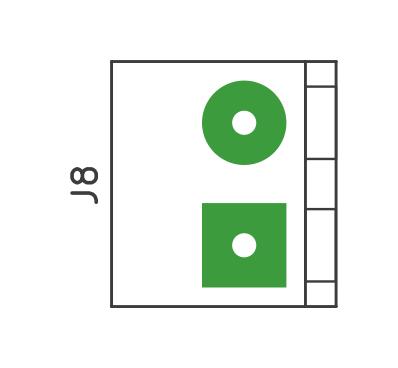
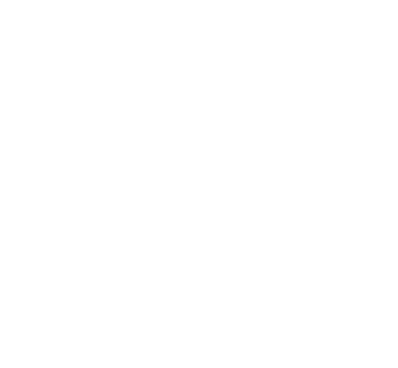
J8: (223, 184) -> none

